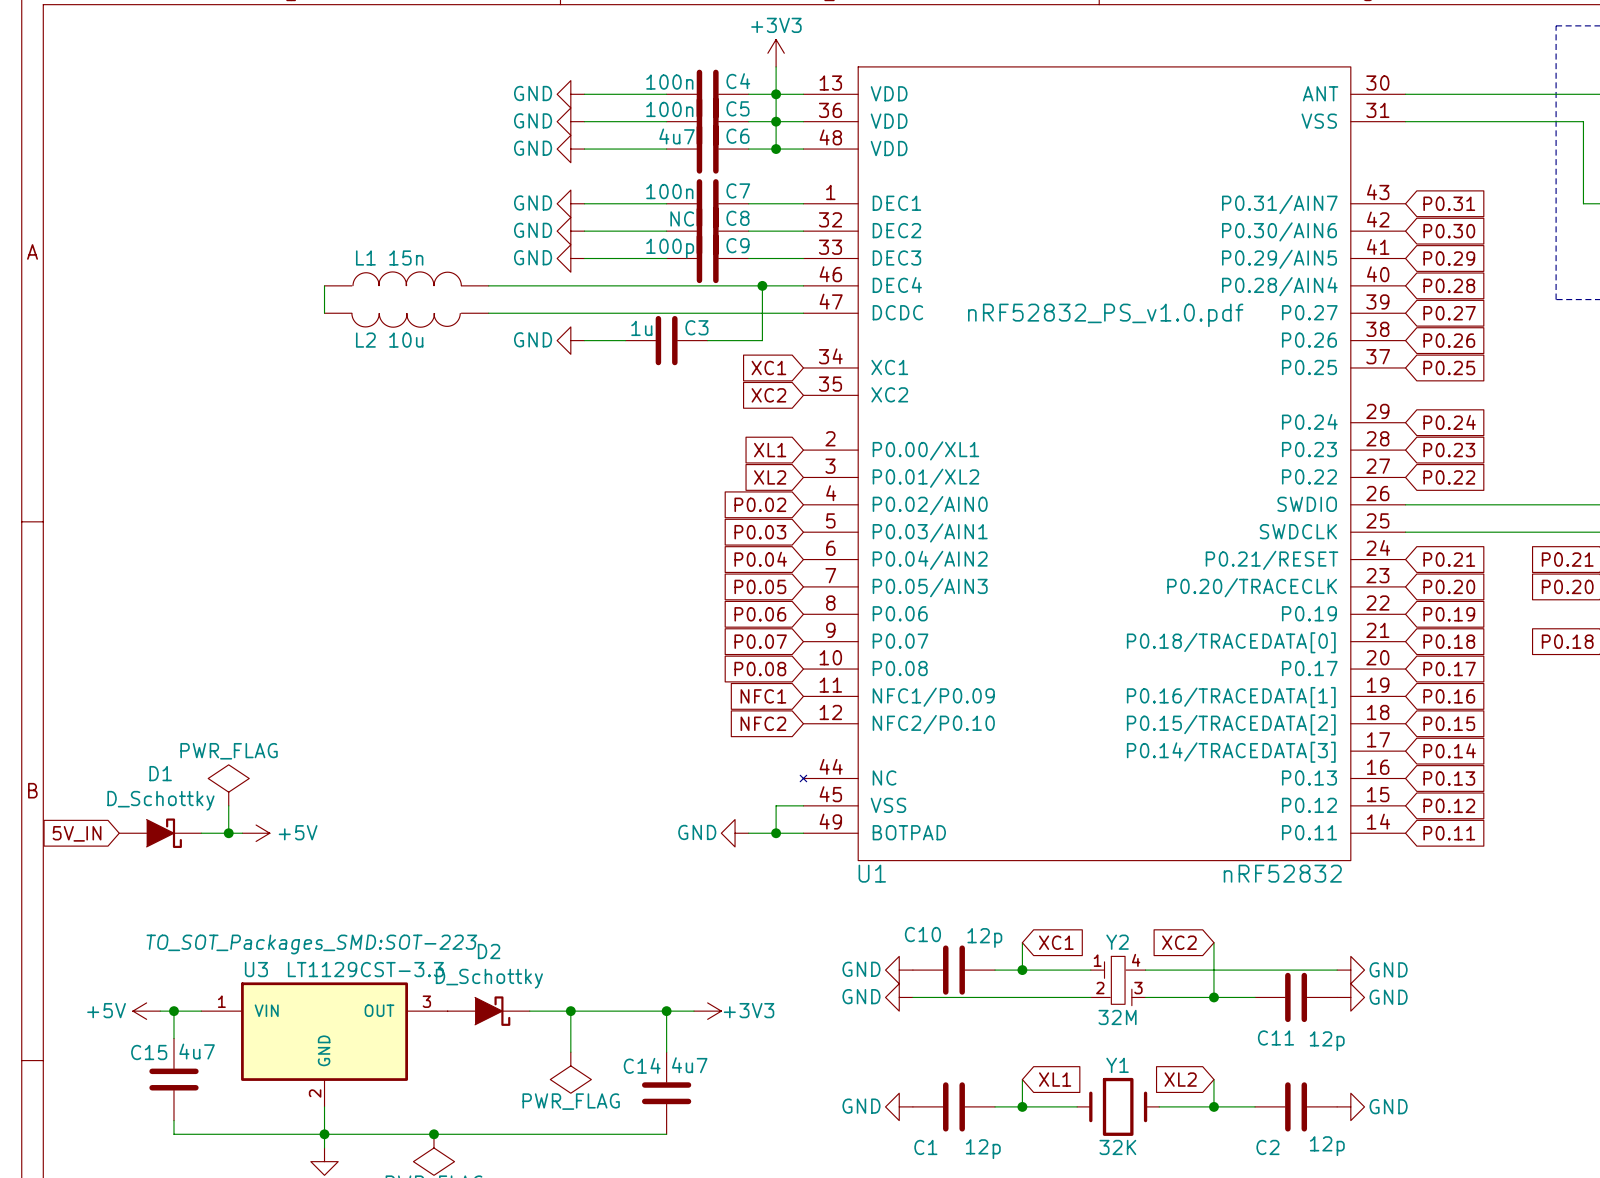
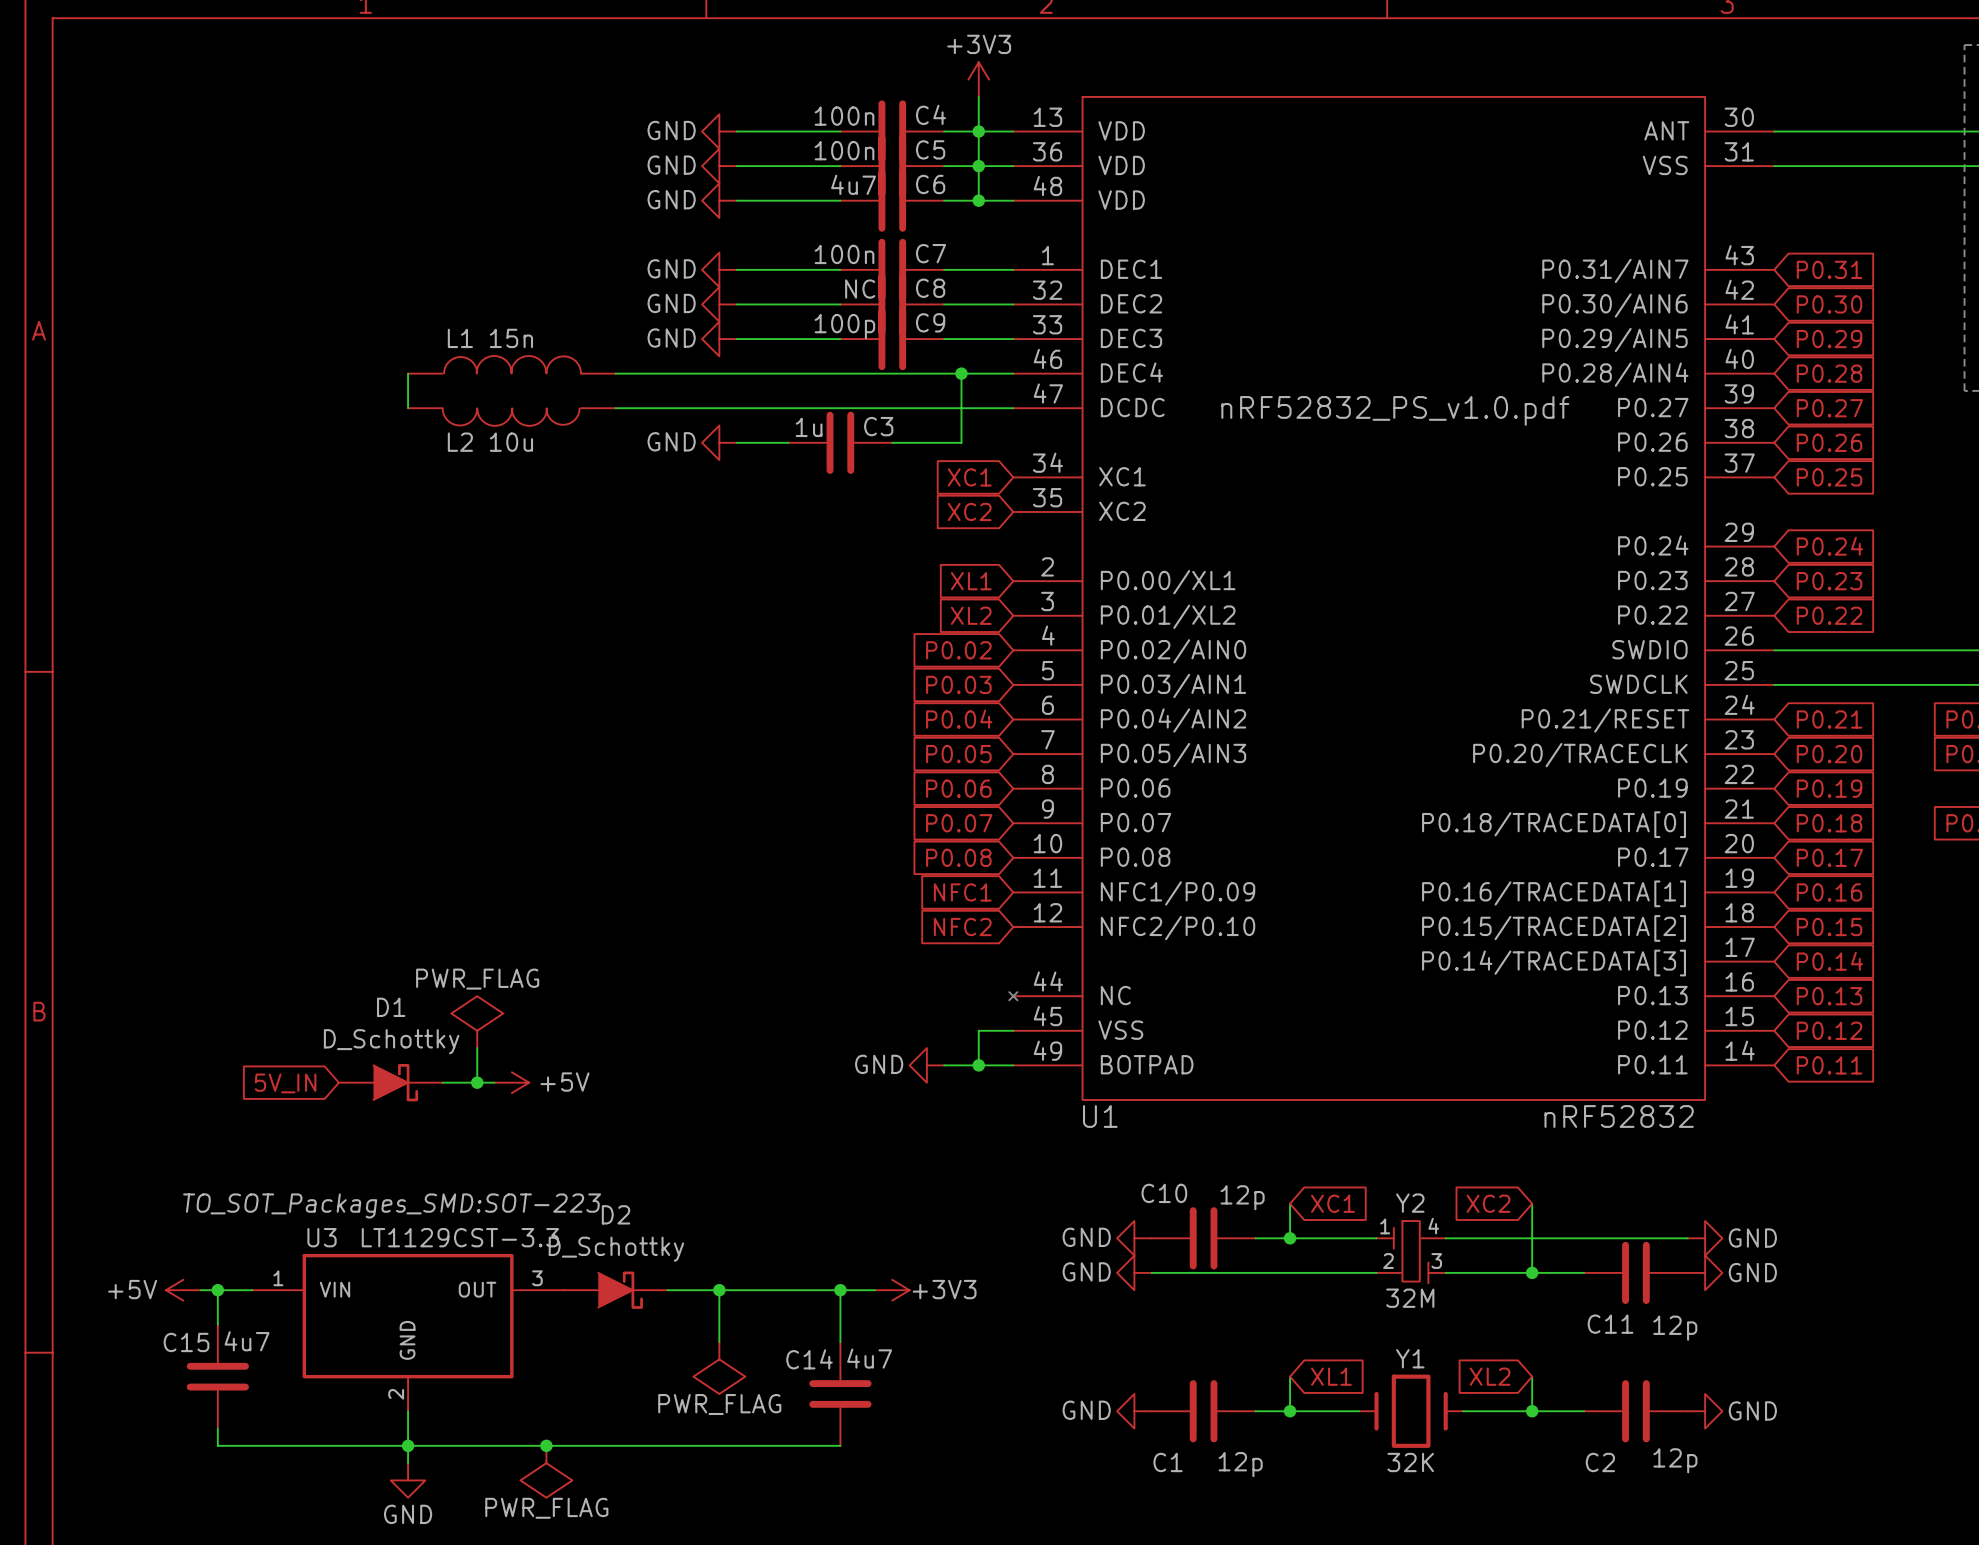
power symbol position: PWR_FLAG (228, 785) -> PWR_FLAG (477, 1022)
wire: (228, 805) (228, 833) -> (477, 1048) (477, 1082)
global label position: 5V_IN (77, 833) -> 5V_IN (285, 1083)
D1 position: (160, 833) -> (390, 1082)
wire: (201, 833) (242, 833) -> (442, 1082) (494, 1082)
junction: (228, 833) -> none
power symbol position: +5V (256, 833) -> +5V (511, 1082)
junction: none -> (477, 1082)

